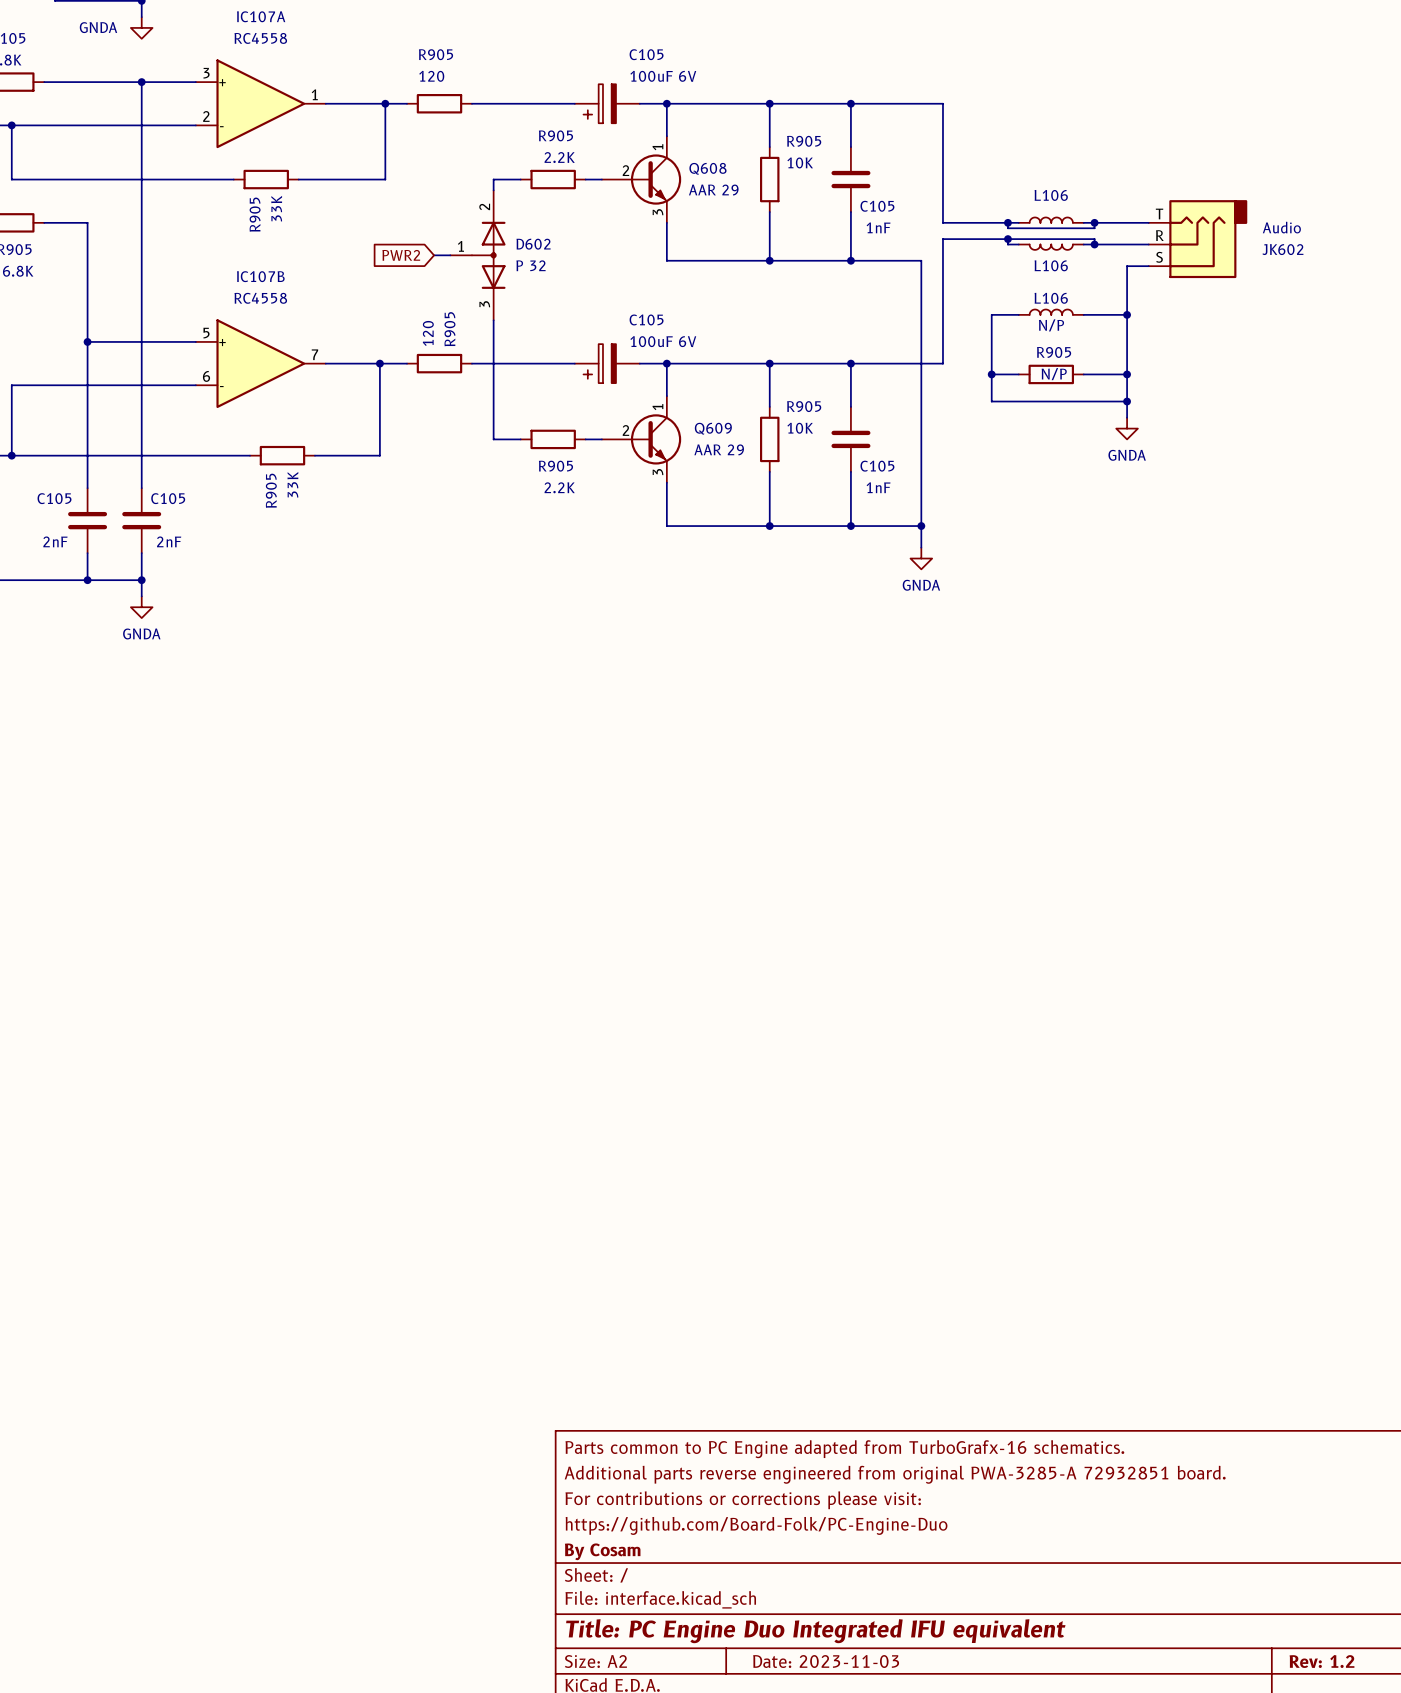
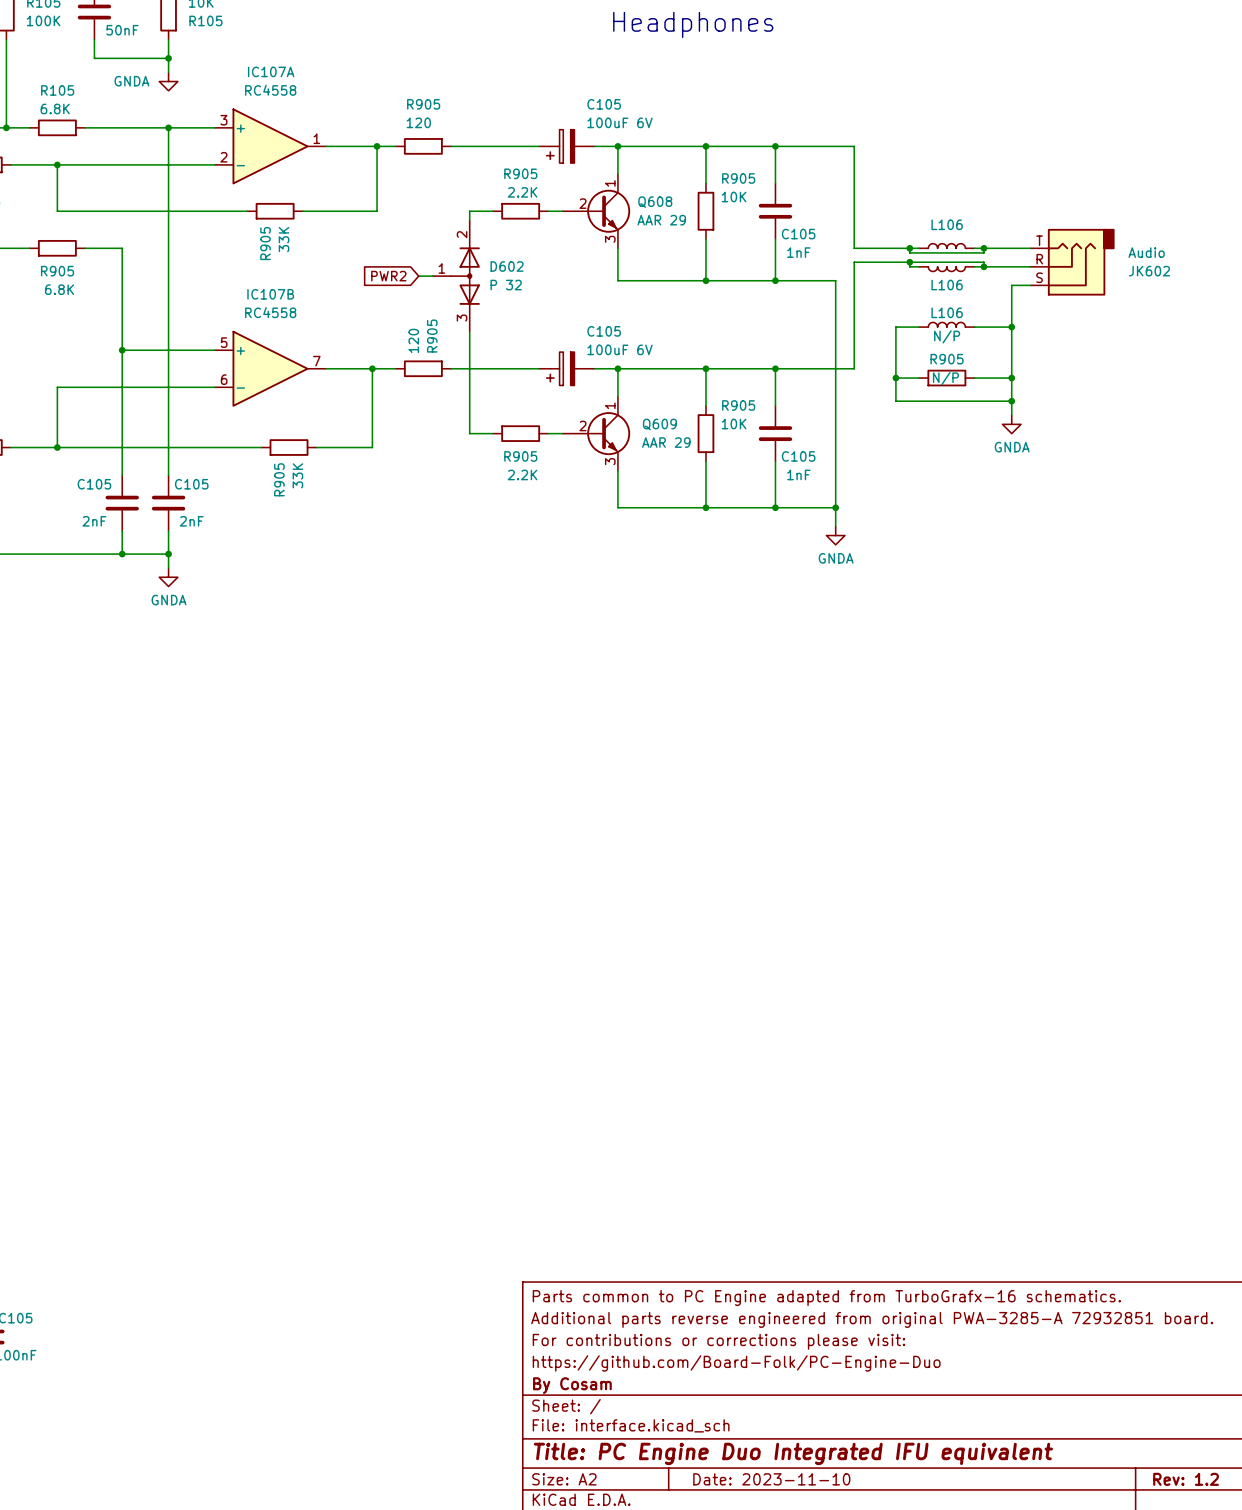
title block: Date: 2023-11-03 (826, 1661) -> Date: 2023-11-10 (771, 1479)

